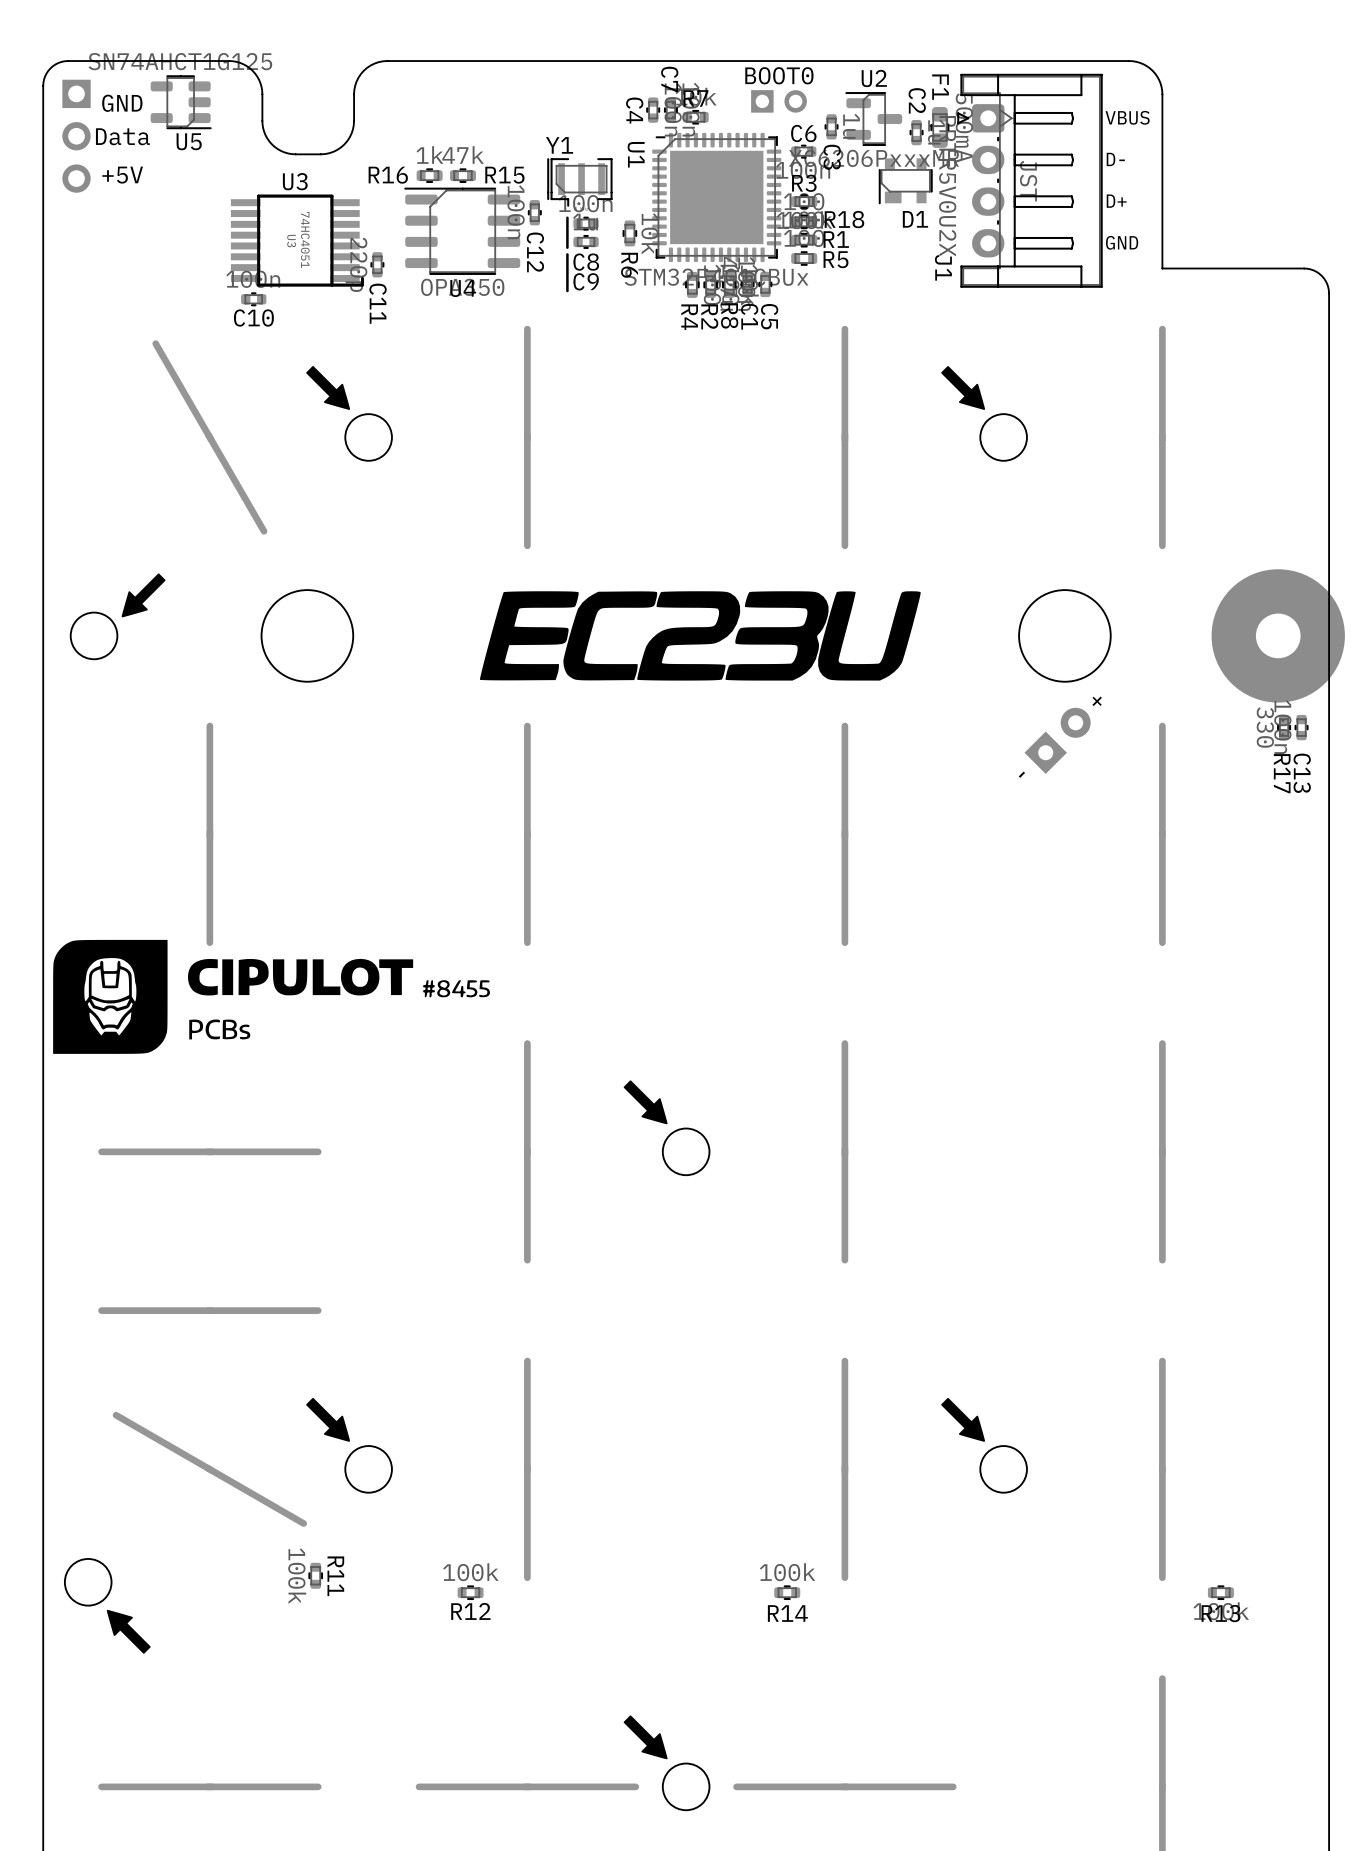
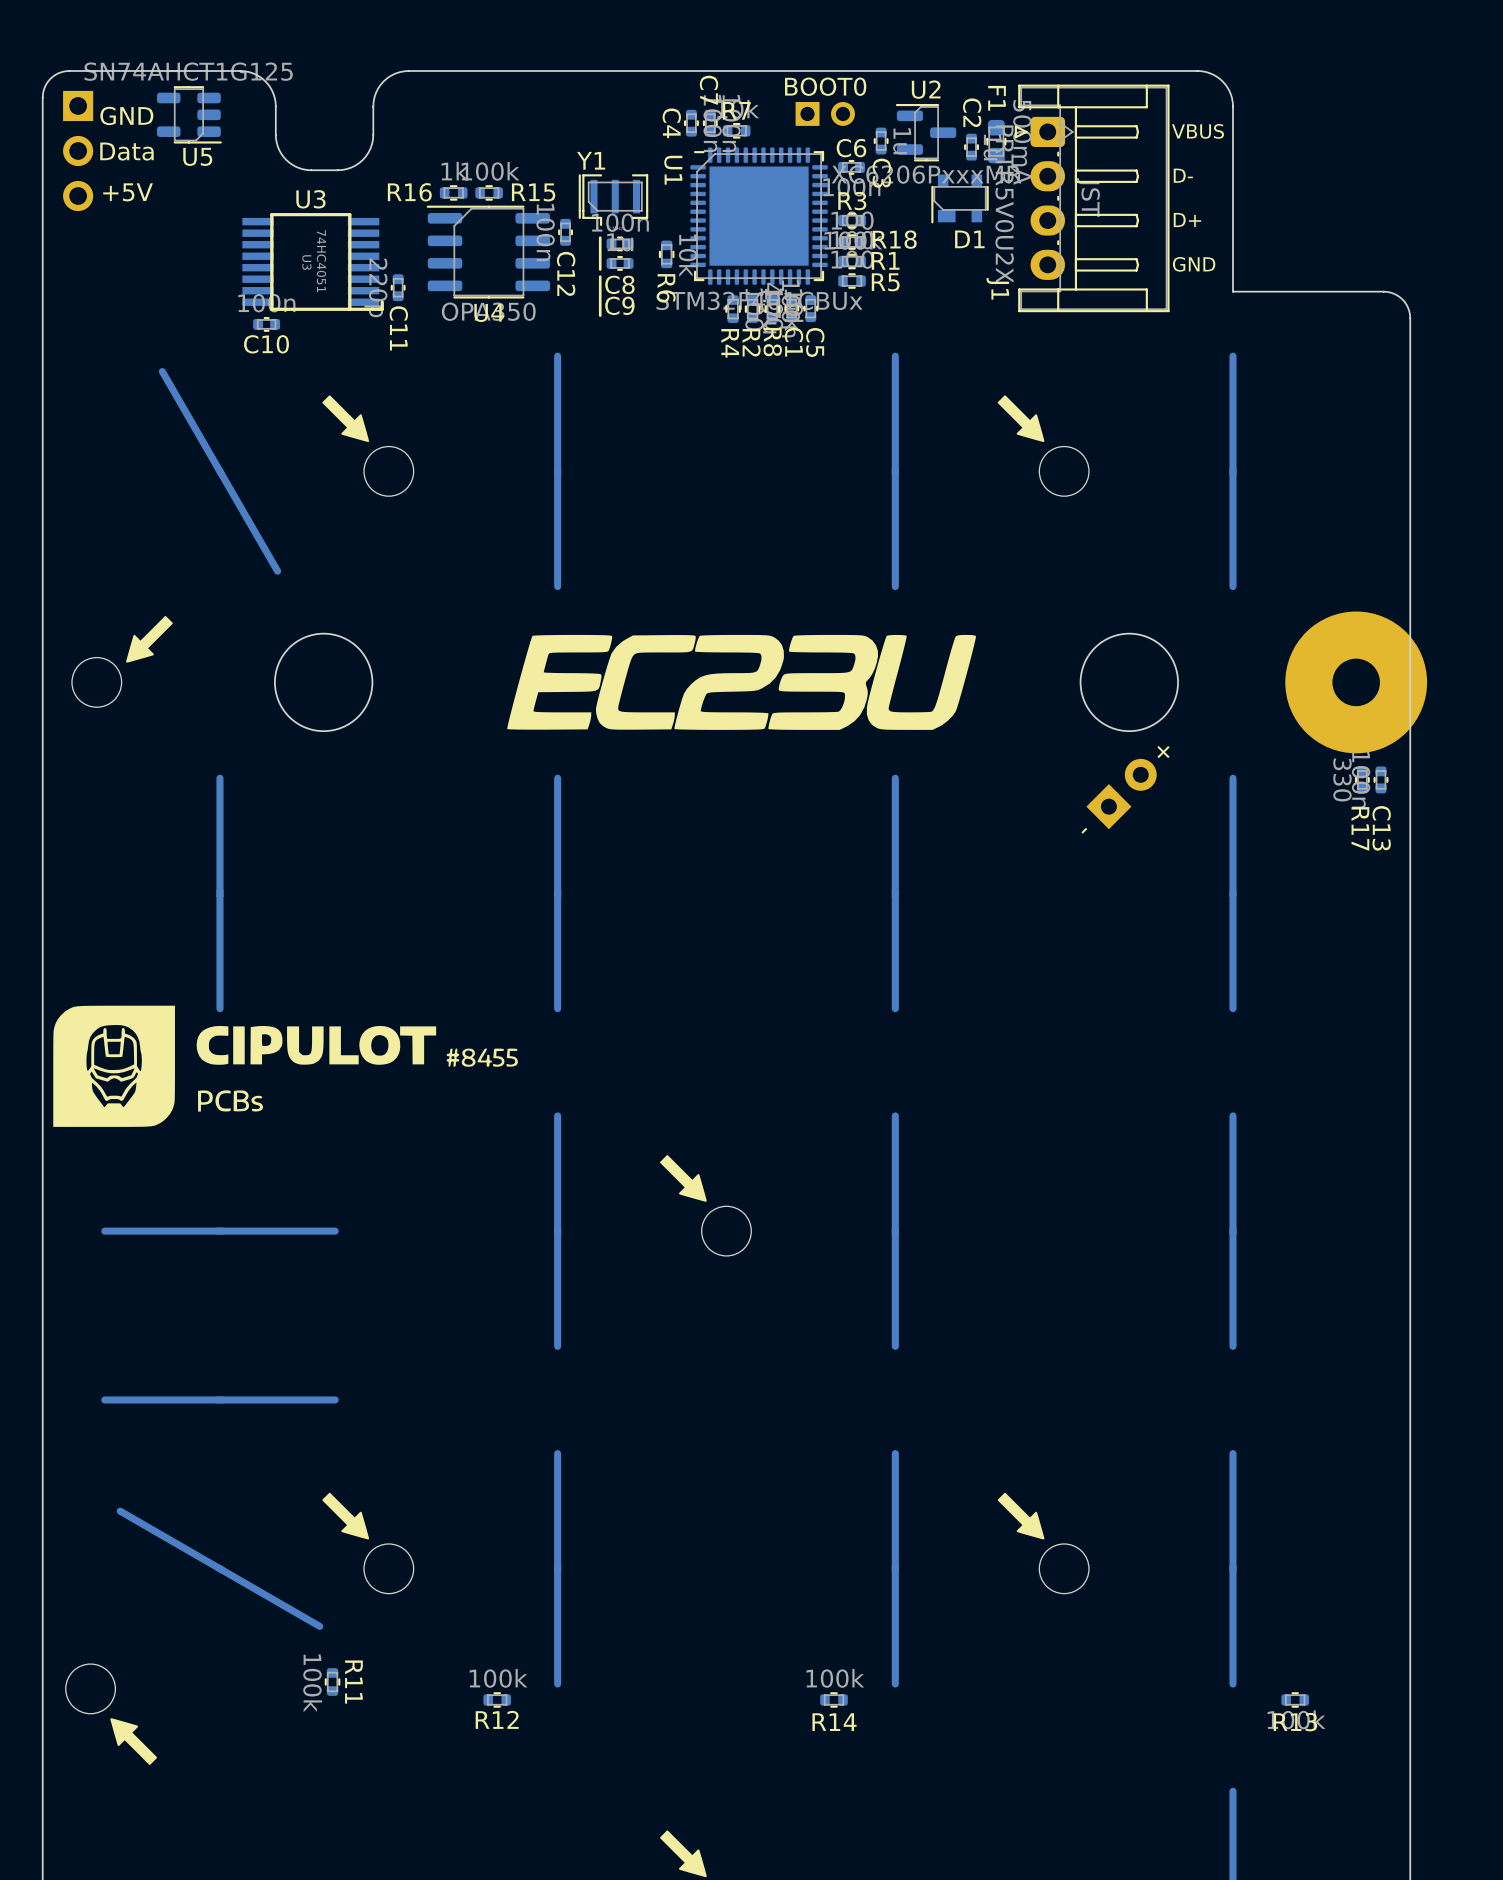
R15 value: 47k (463, 155) -> 100k (490, 171)

